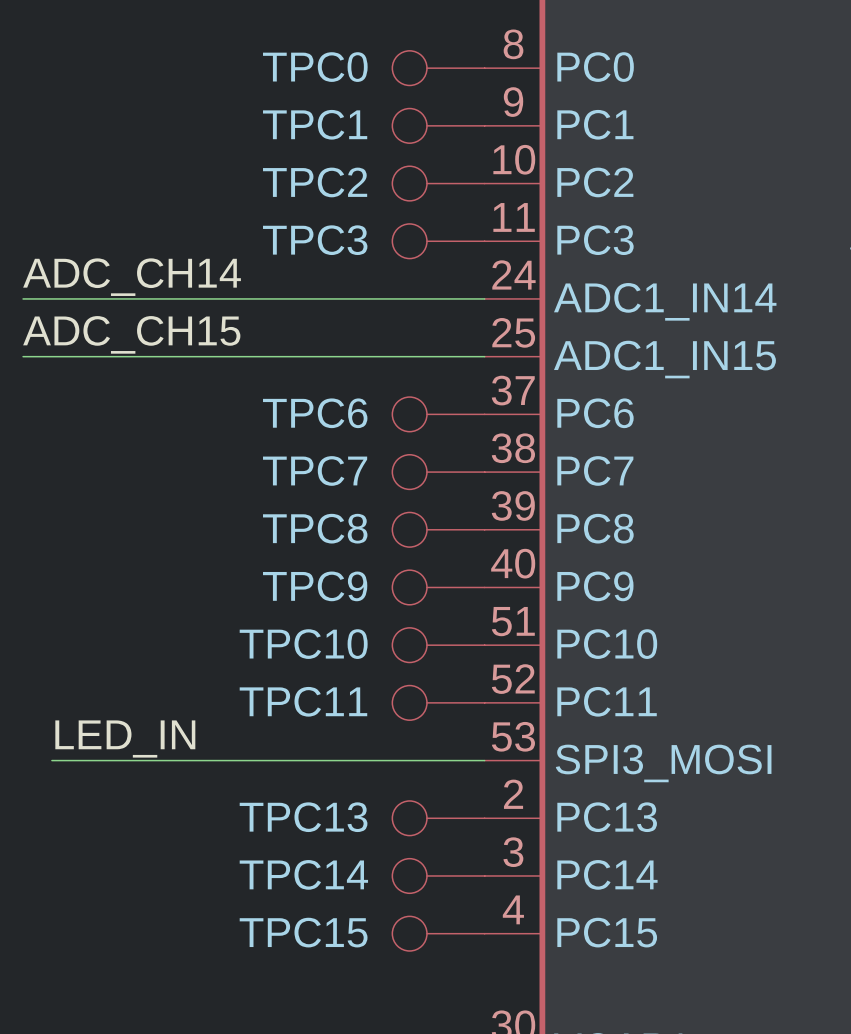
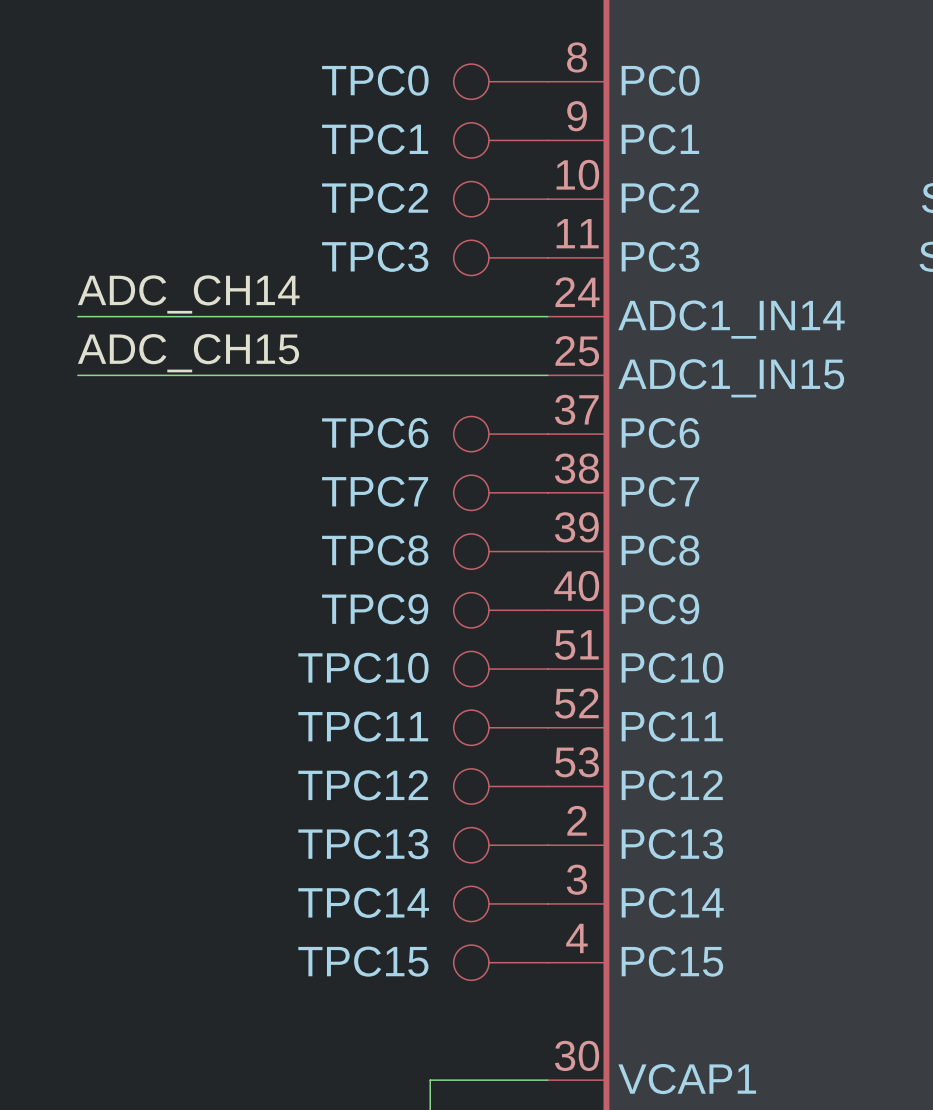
label: LED_IN (125, 739) -> none
wire: (51, 760) (484, 760) -> none
TPC12: none -> (500, 786)
part pin name: SPI3_MOSI (663, 763) -> PC12 (672, 785)

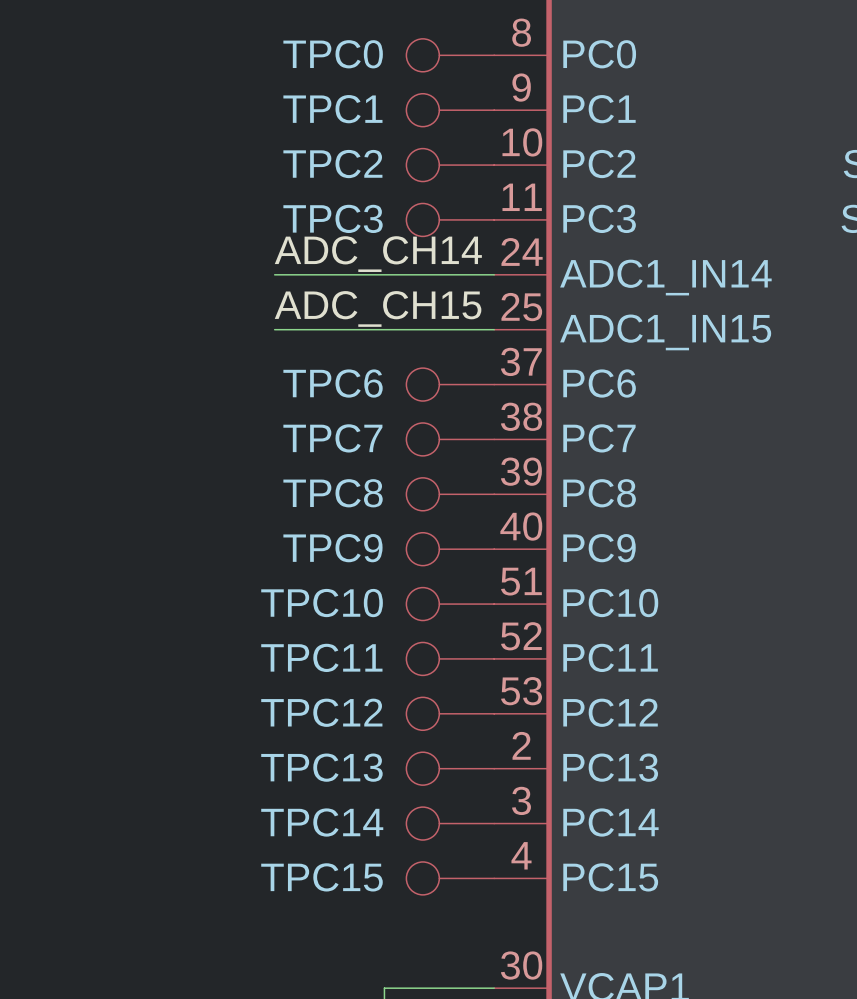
label position: ADC_CH14 (188, 294) -> ADC_CH14 (378, 254)
wire: (77, 316) (312, 316) -> none
label position: ADC_CH15 (188, 353) -> ADC_CH15 (378, 308)
wire: (77, 375) (312, 375) -> none

